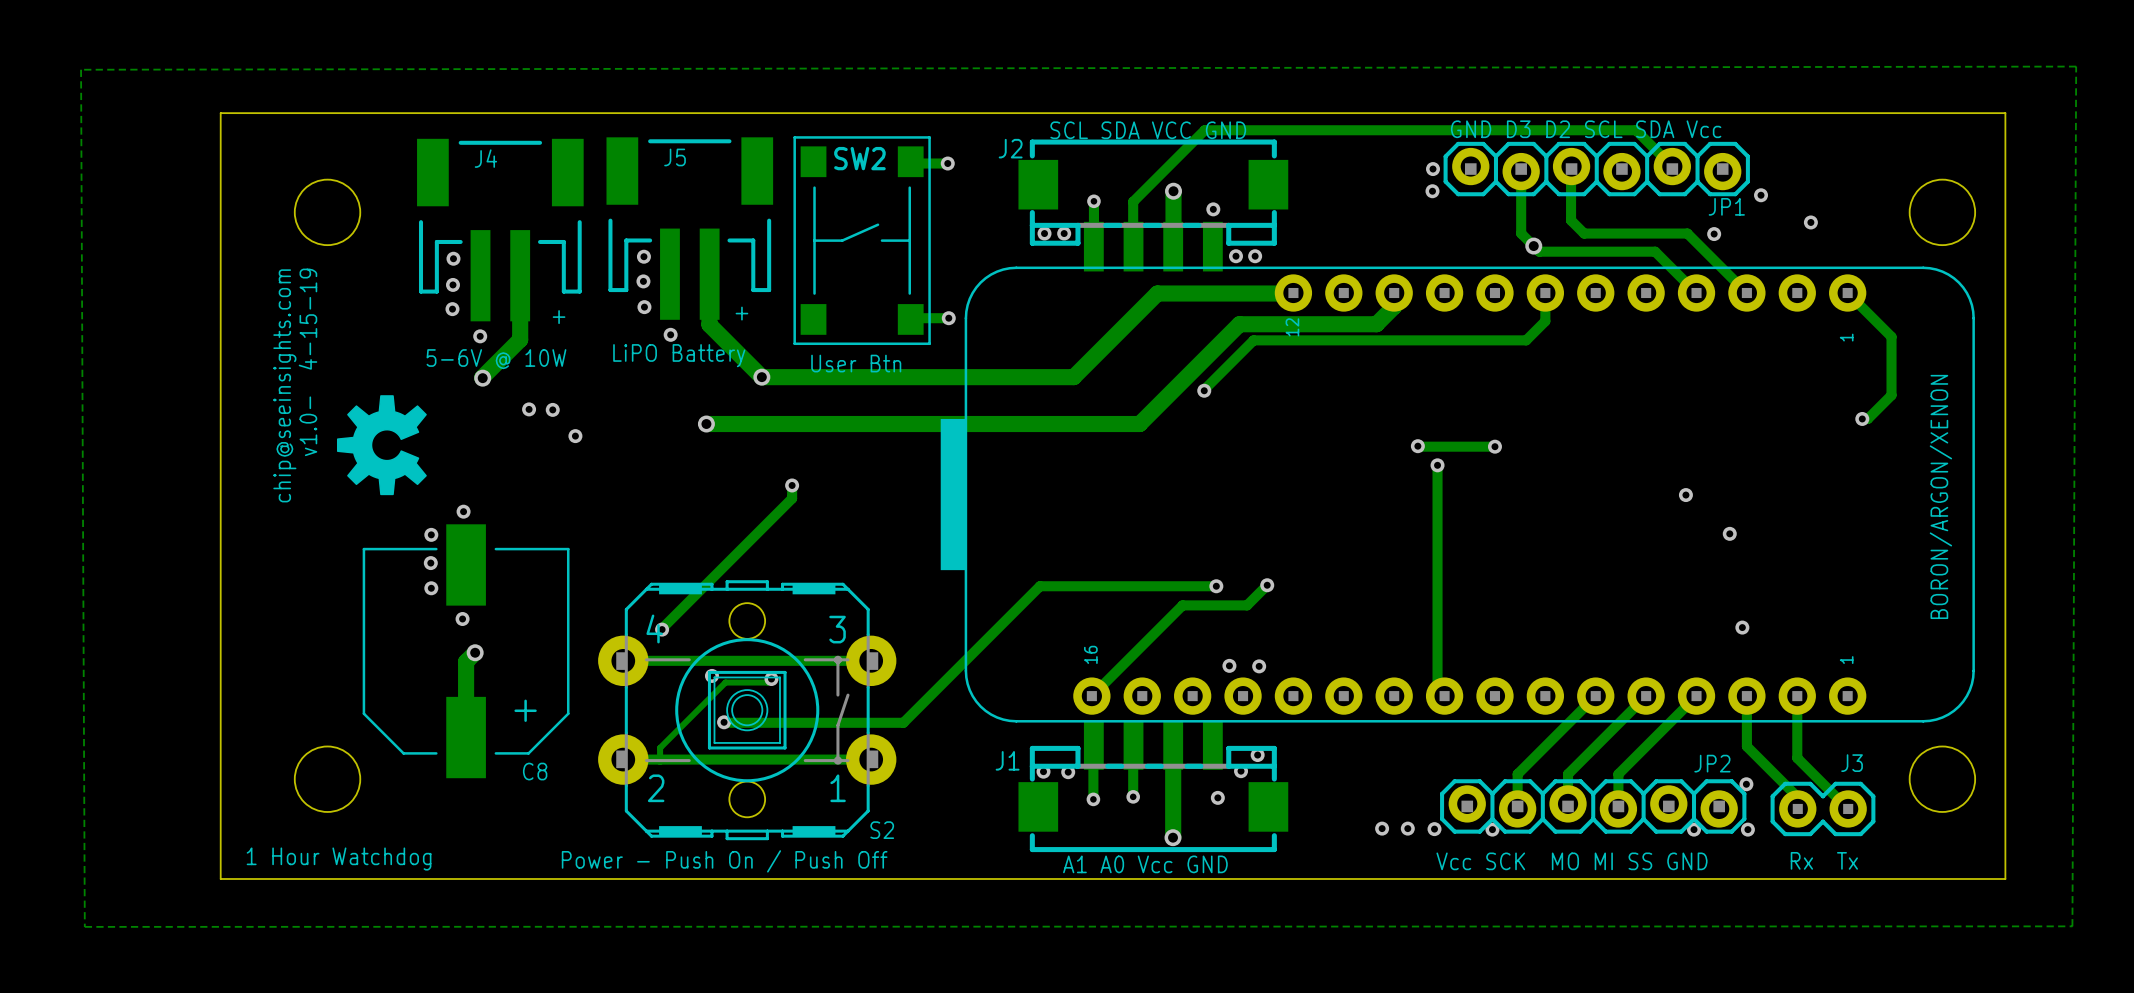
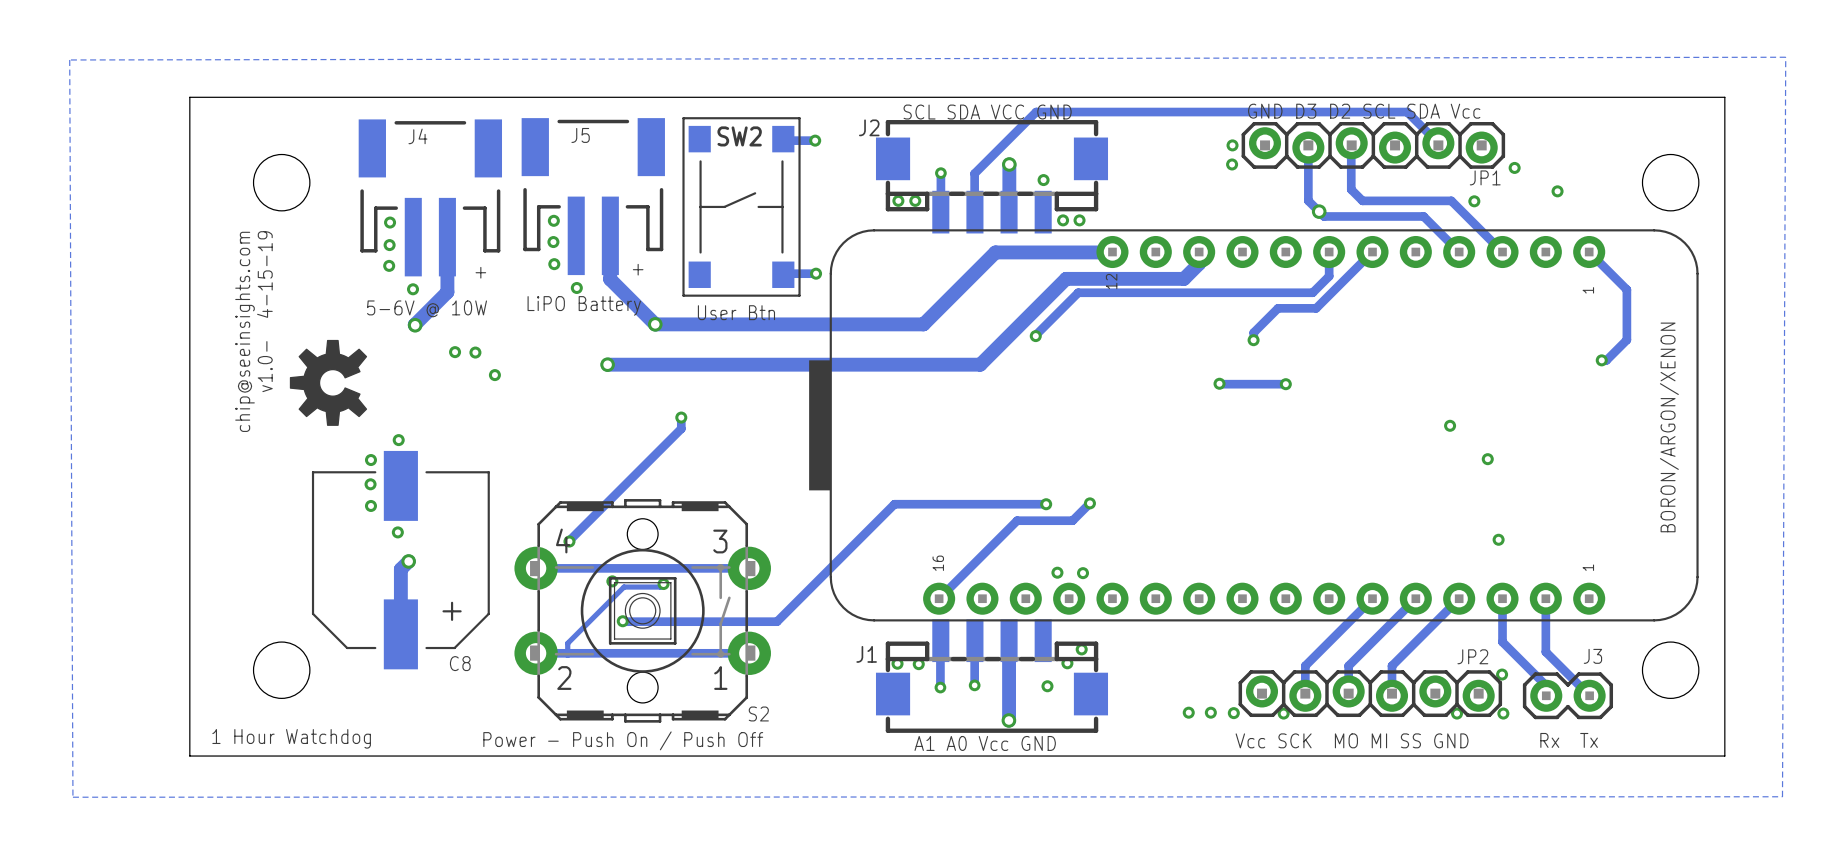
track: none -> (1372, 252) (1316, 308) (1278, 308) (1253, 332) (1253, 340)
track: (1437, 465) (1437, 689) (1444, 696) -> none
via position: (1437, 465) -> (1253, 340)

